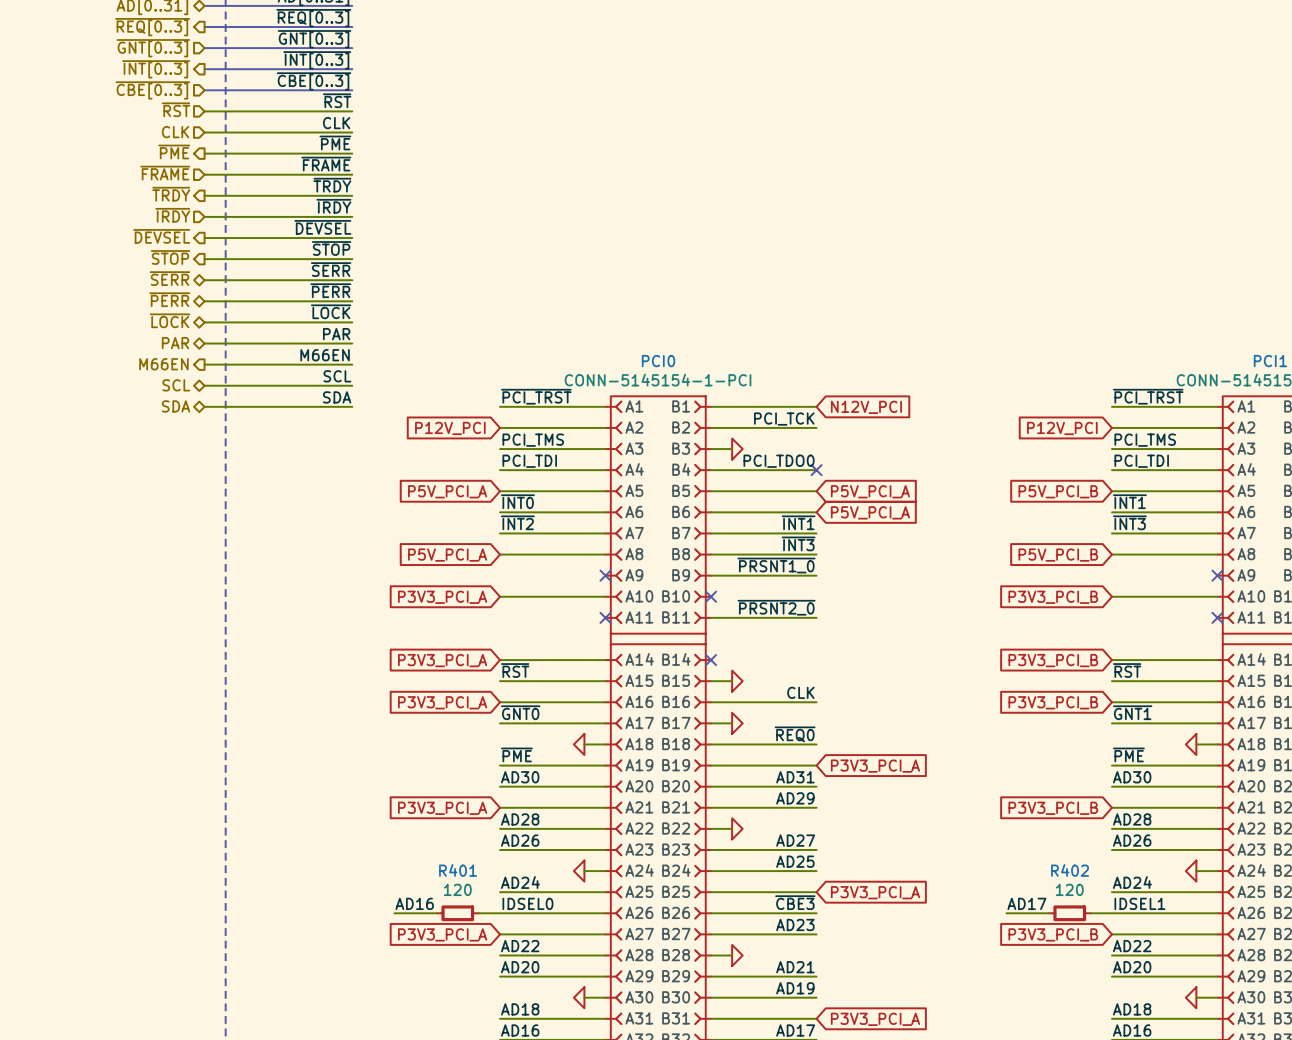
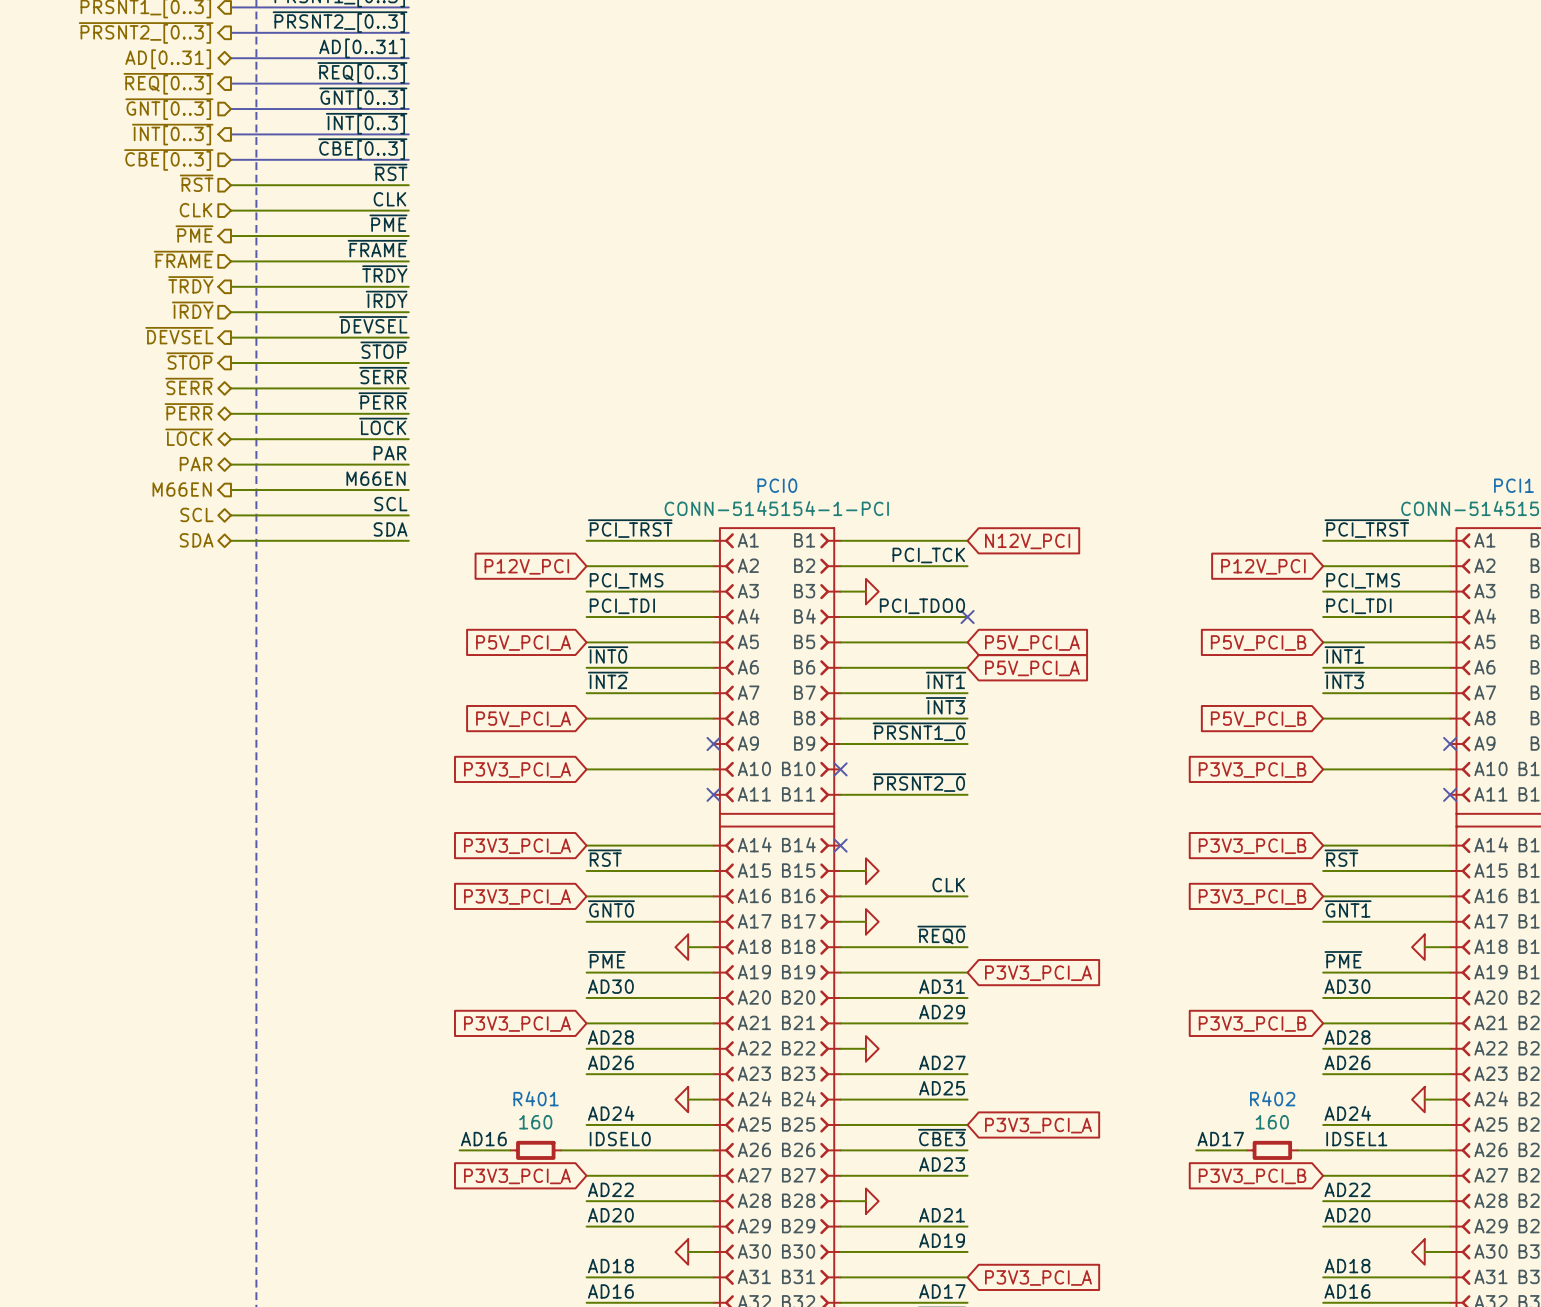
R401 value: 120 (457, 889) -> 160 (535, 1122)
R402 value: 120 (1069, 889) -> 160 (1272, 1122)

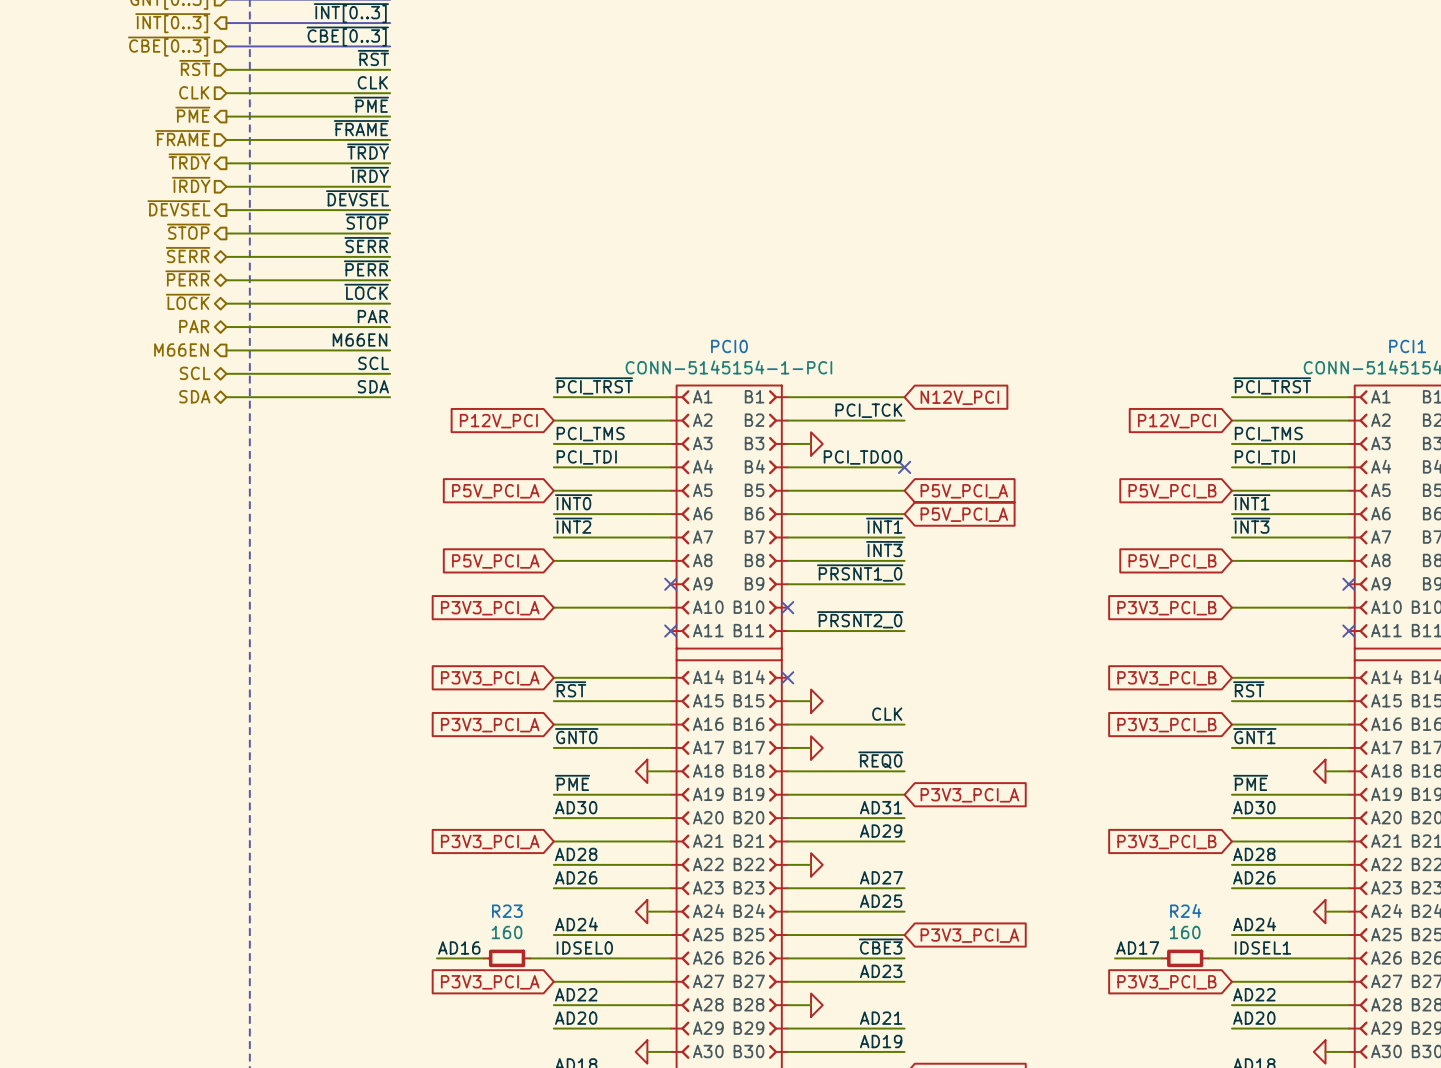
R401 name: R401 (536, 1098) -> R23 (507, 911)
R402 name: R402 (1272, 1098) -> R24 (1185, 910)

